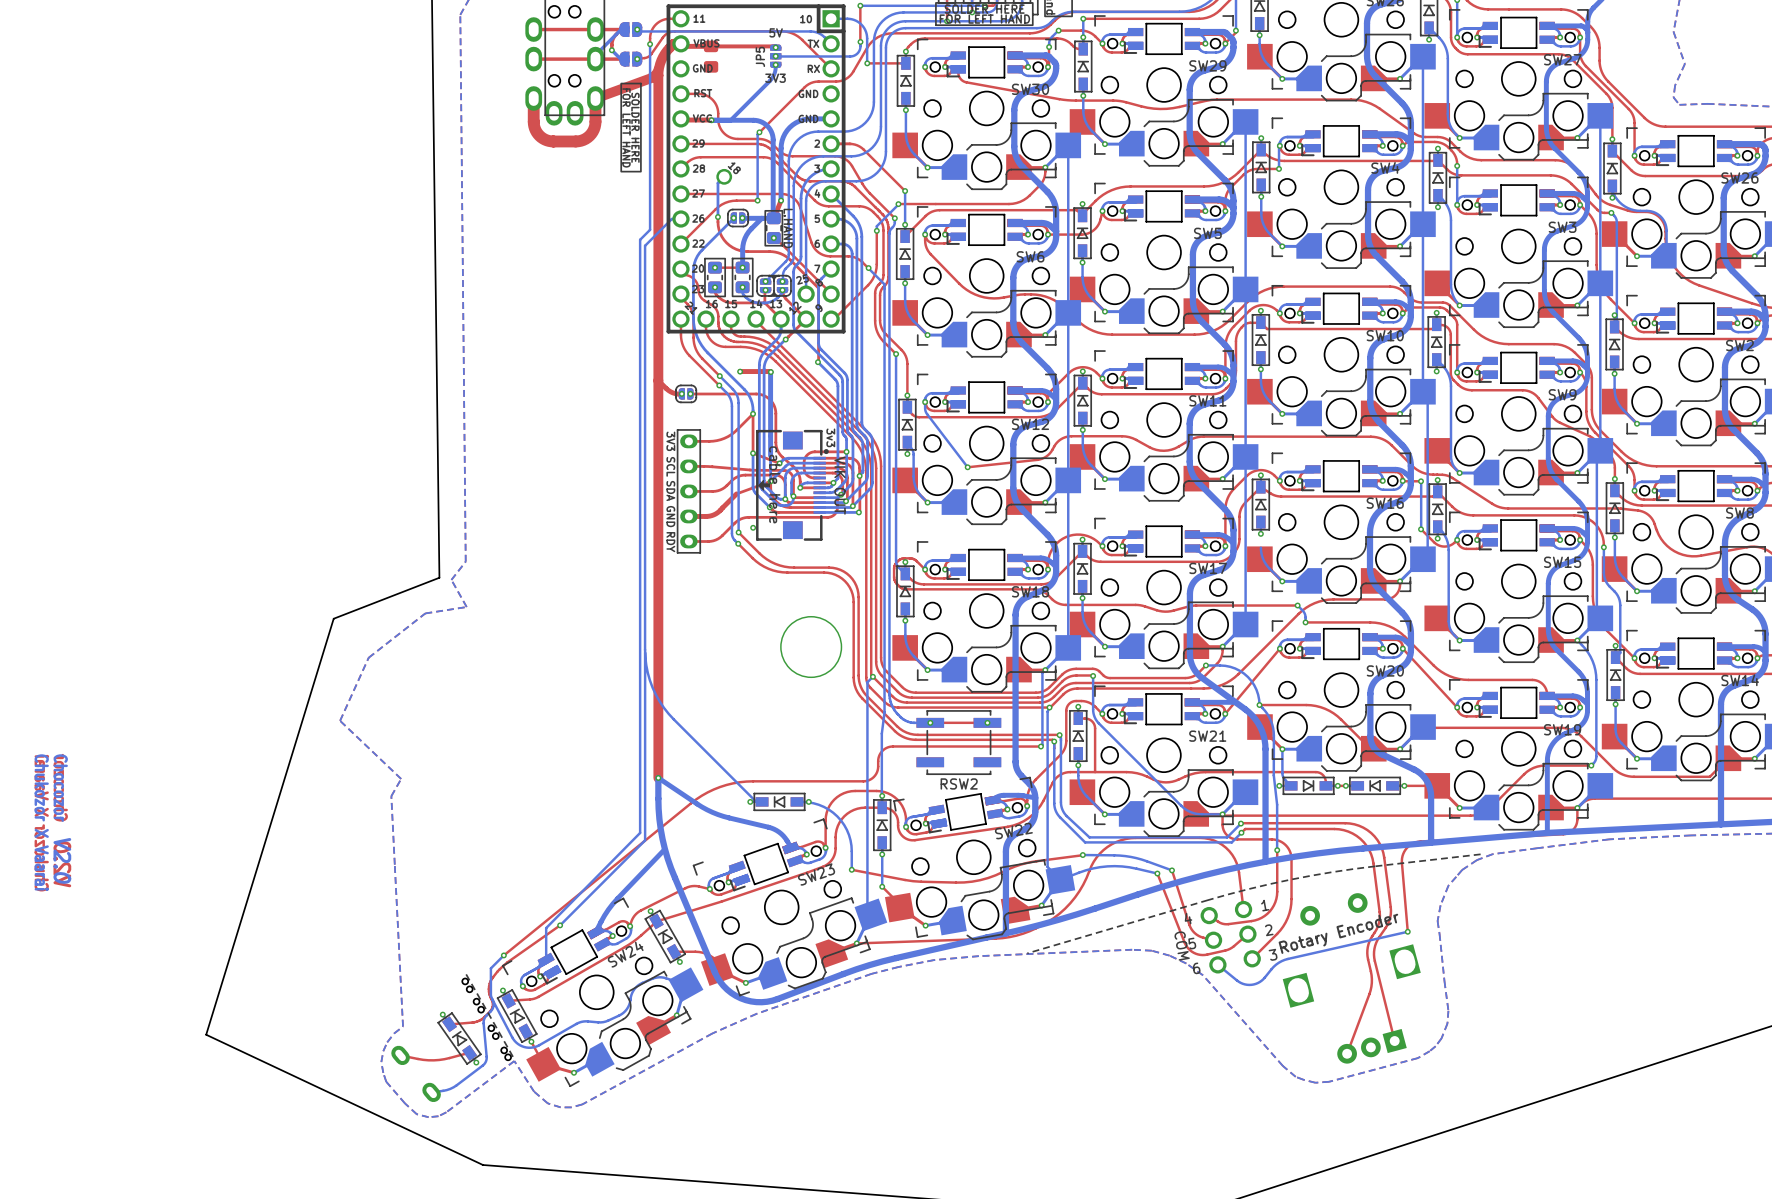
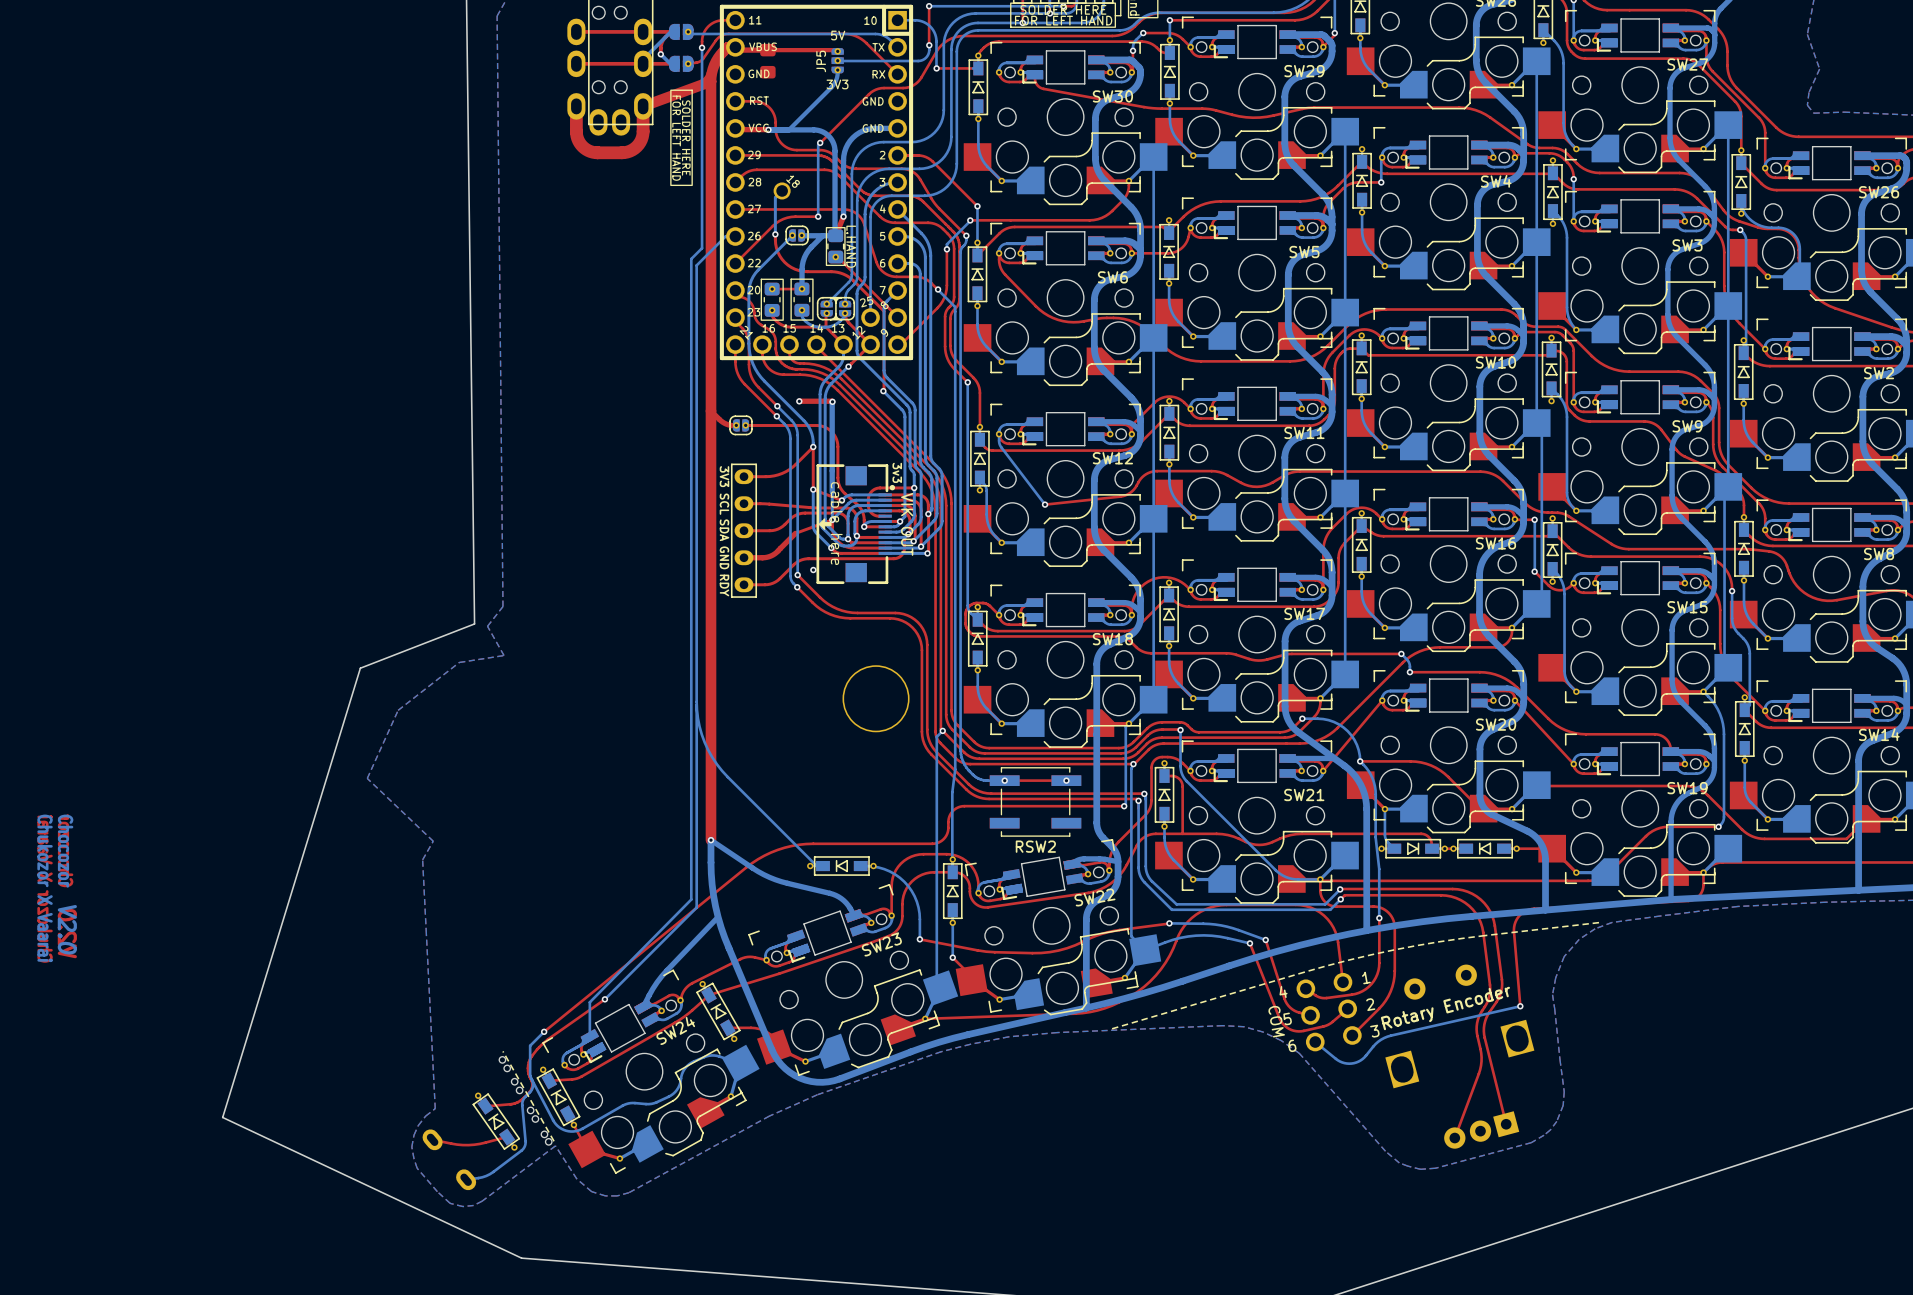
bottom track: none -> (1361, 563) (1361, 591)

